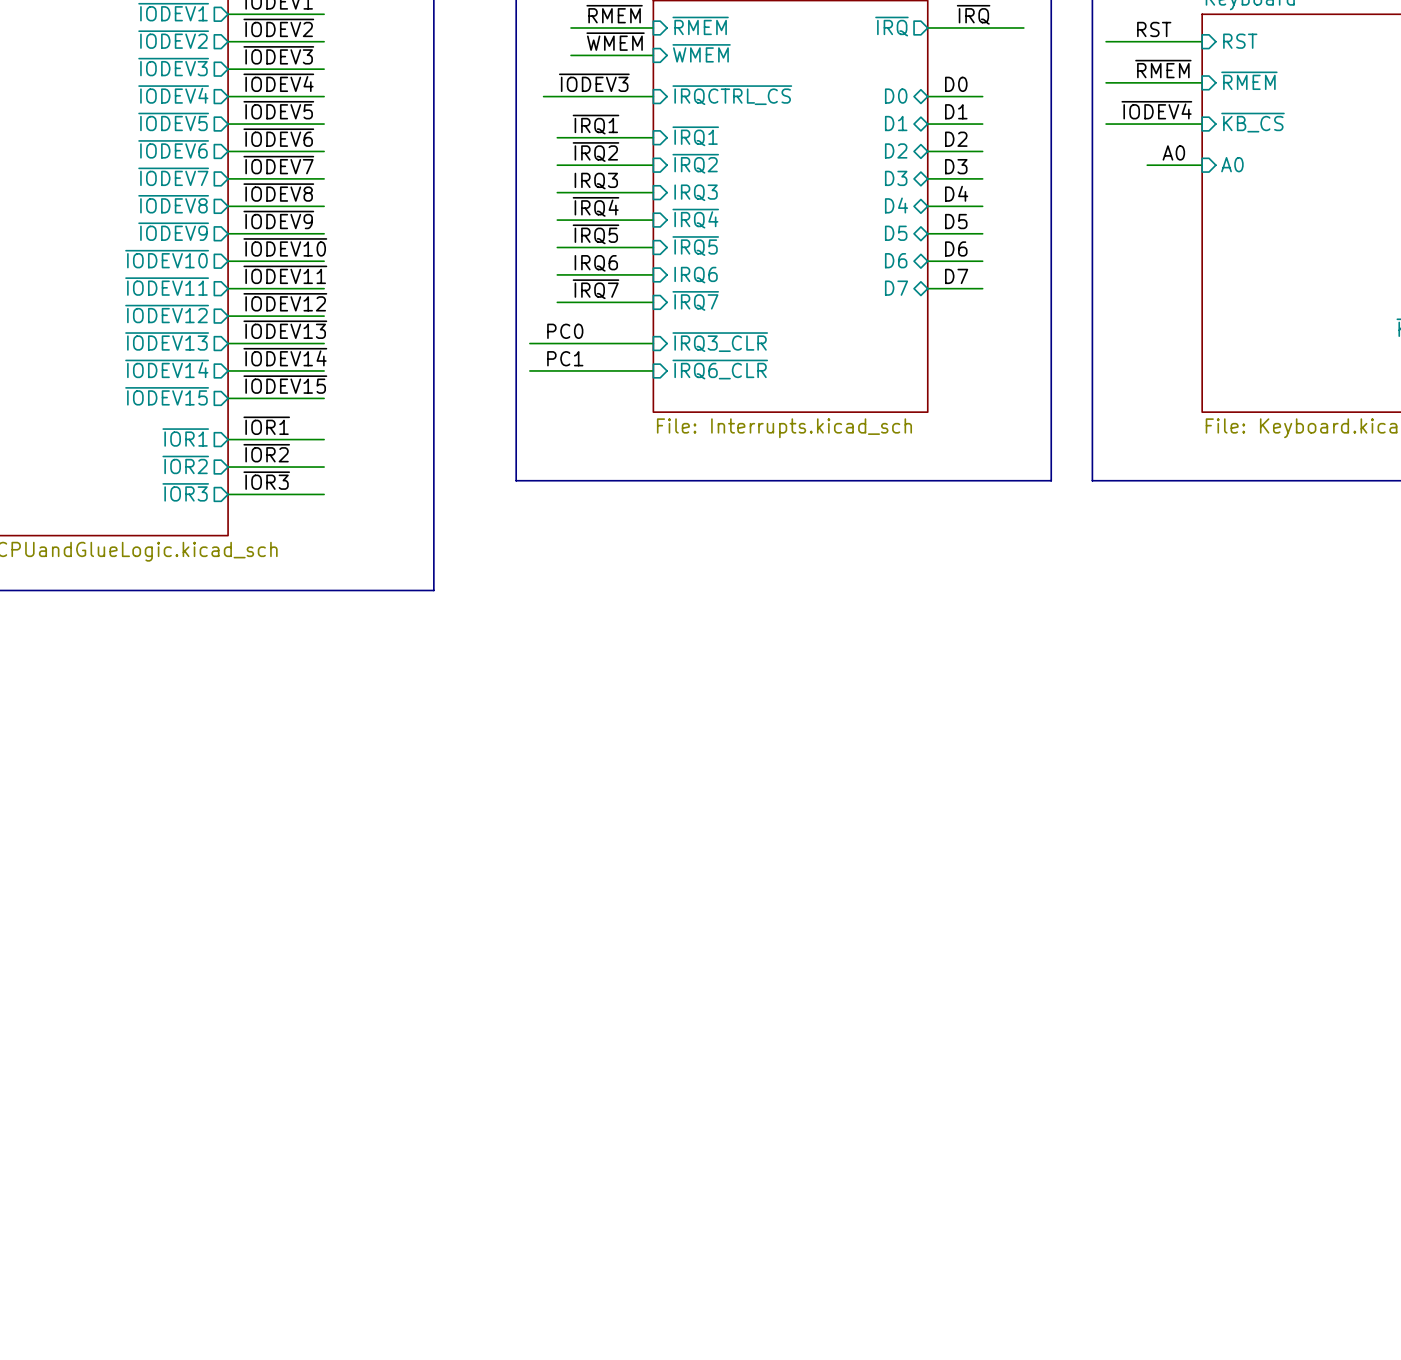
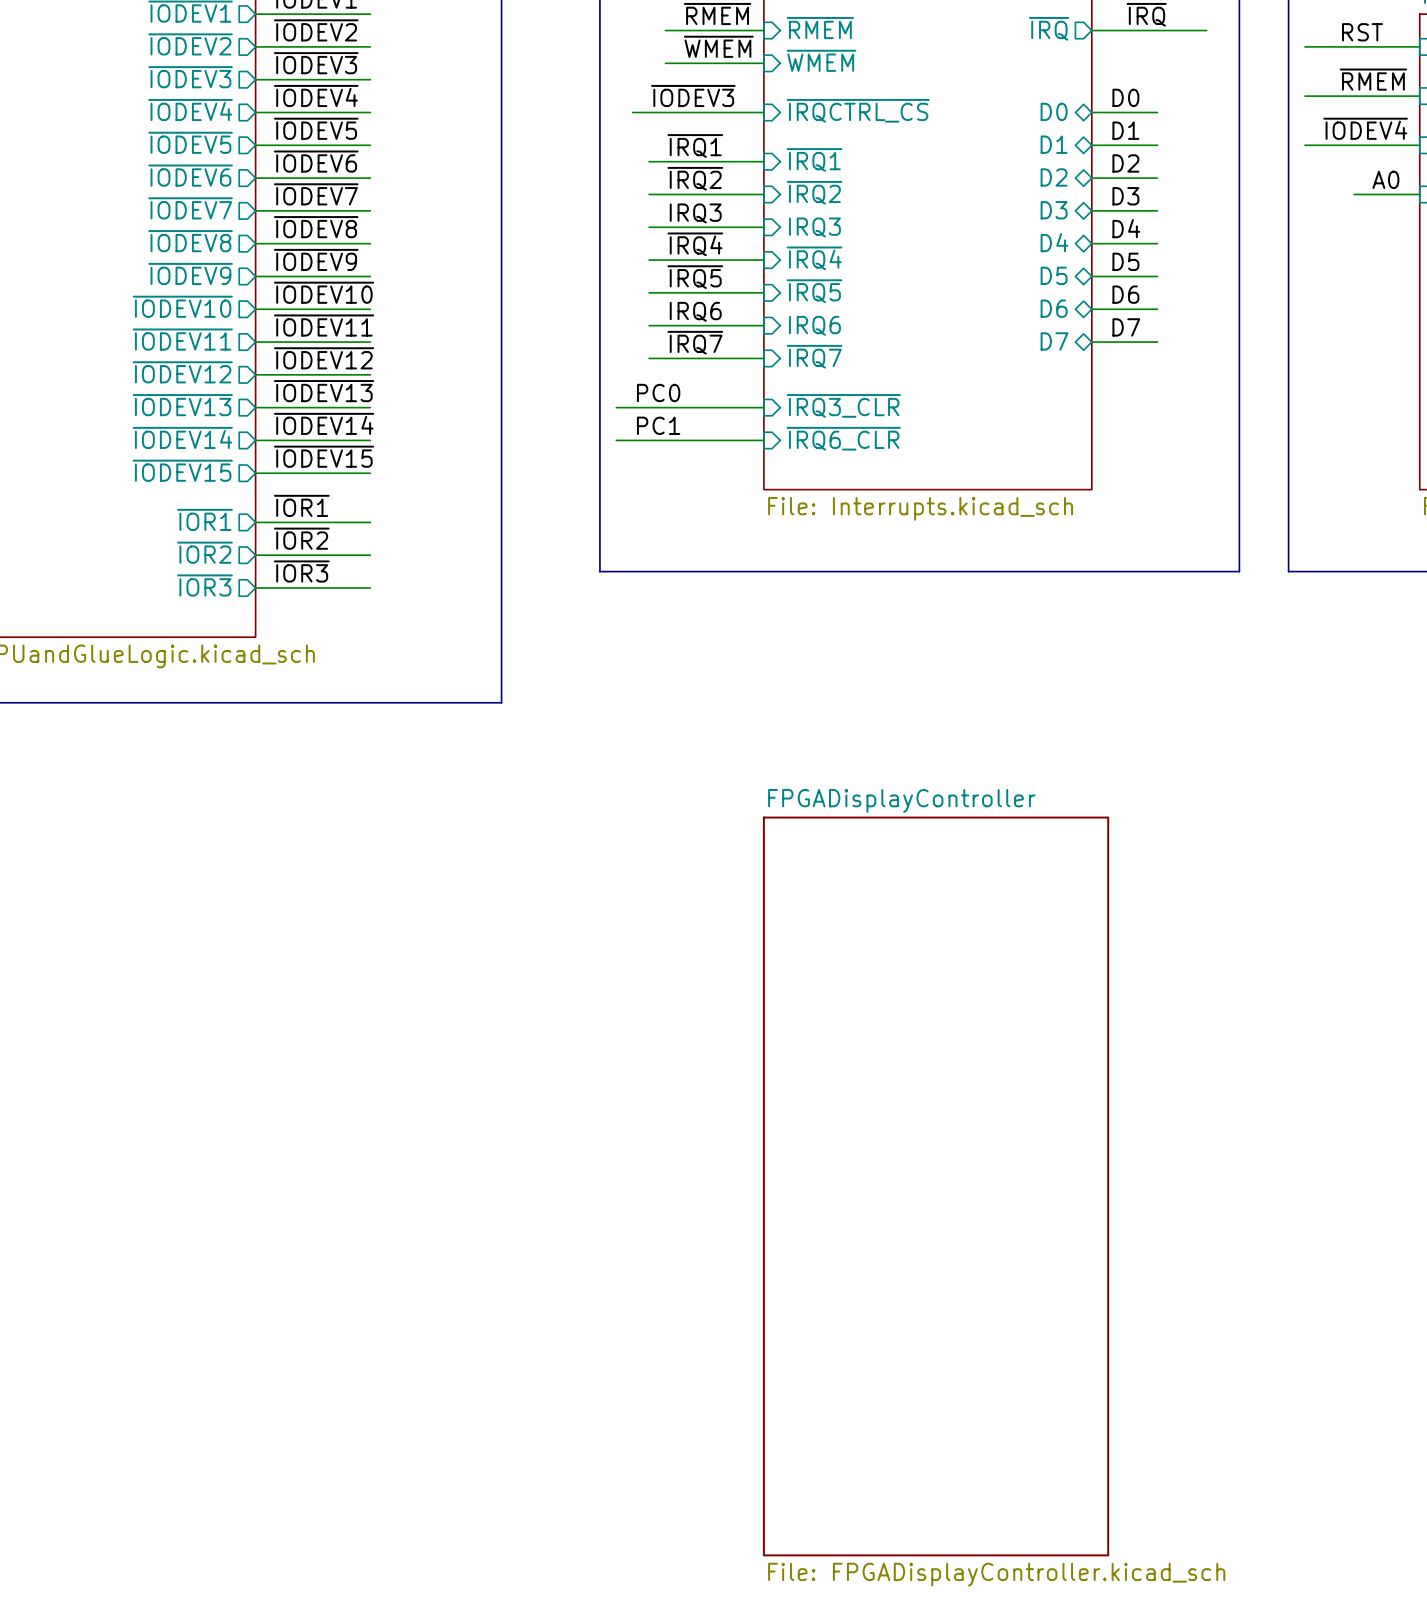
sheet FPGADisplayController: none -> File: FPGADisplayController.kicad_sch (936, 1186)

